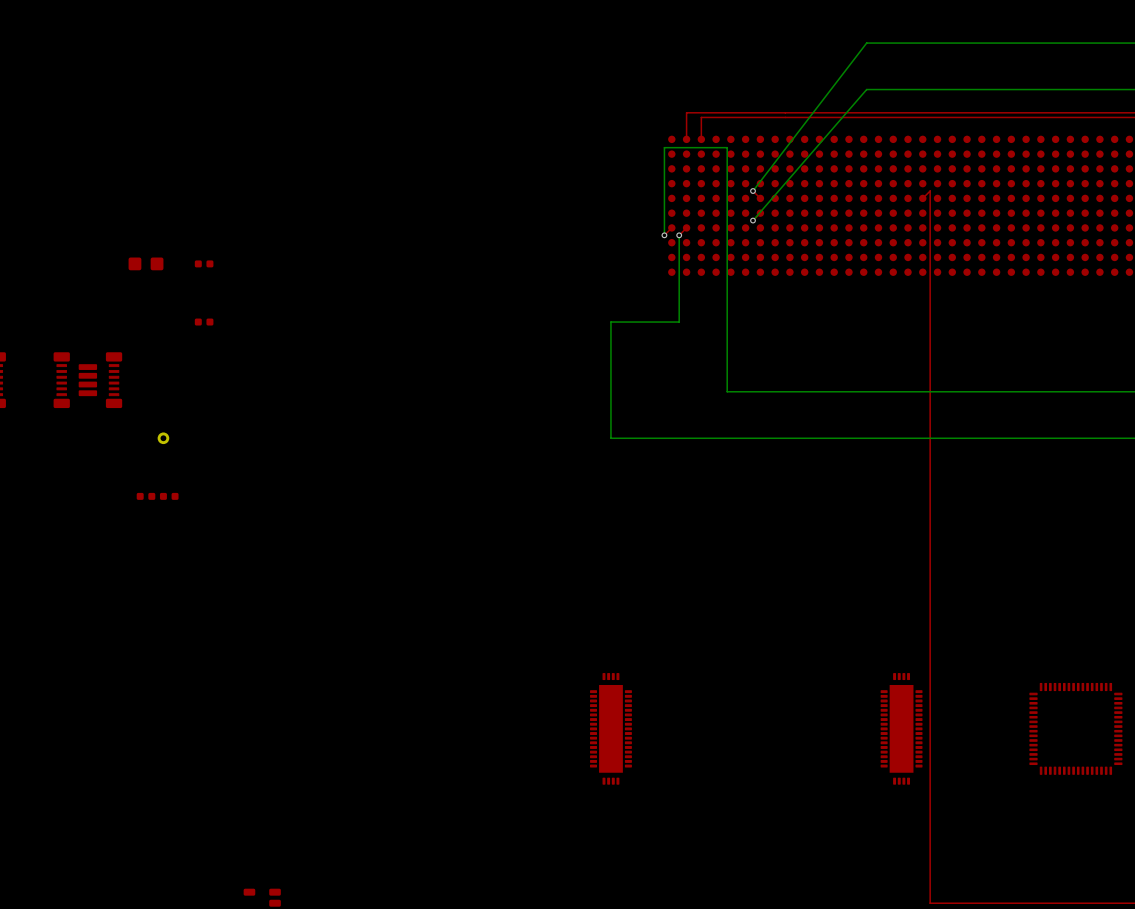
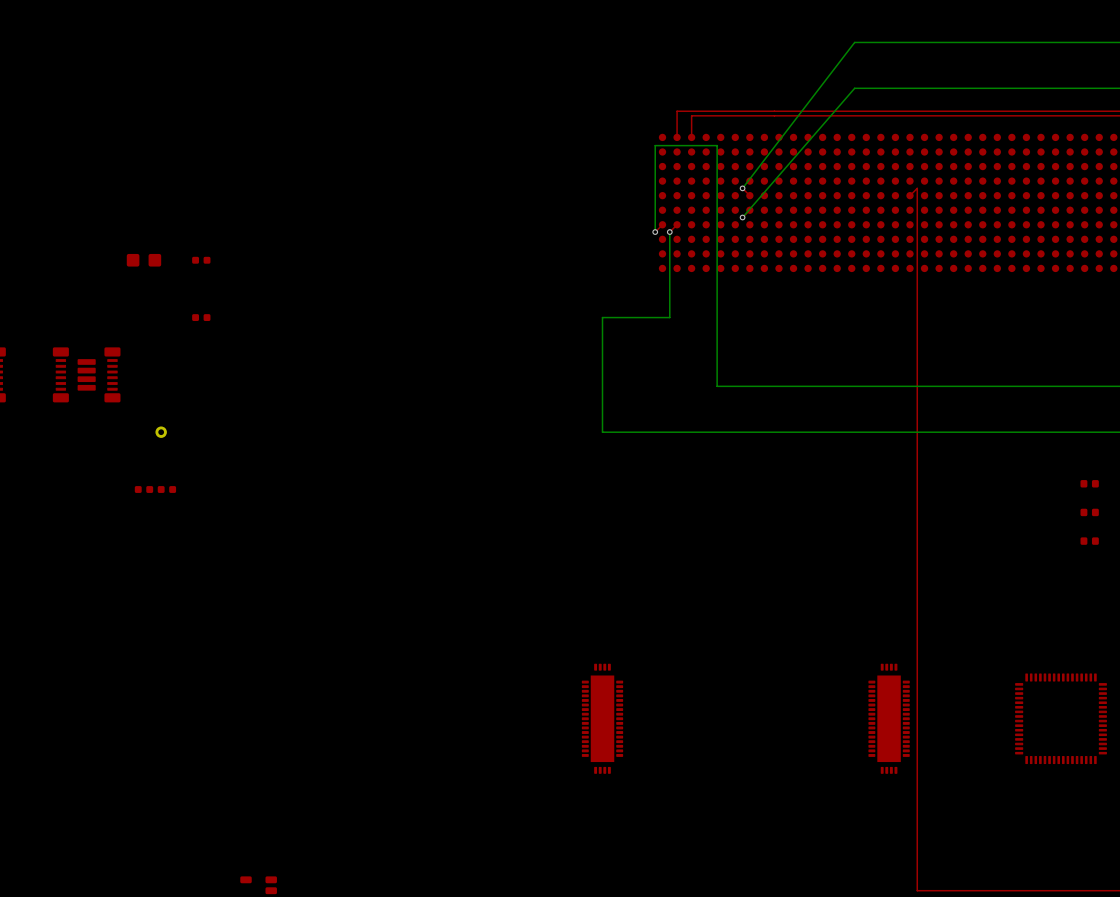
part: none -> (1089, 483)
part: none -> (1089, 512)
part: none -> (1089, 541)

